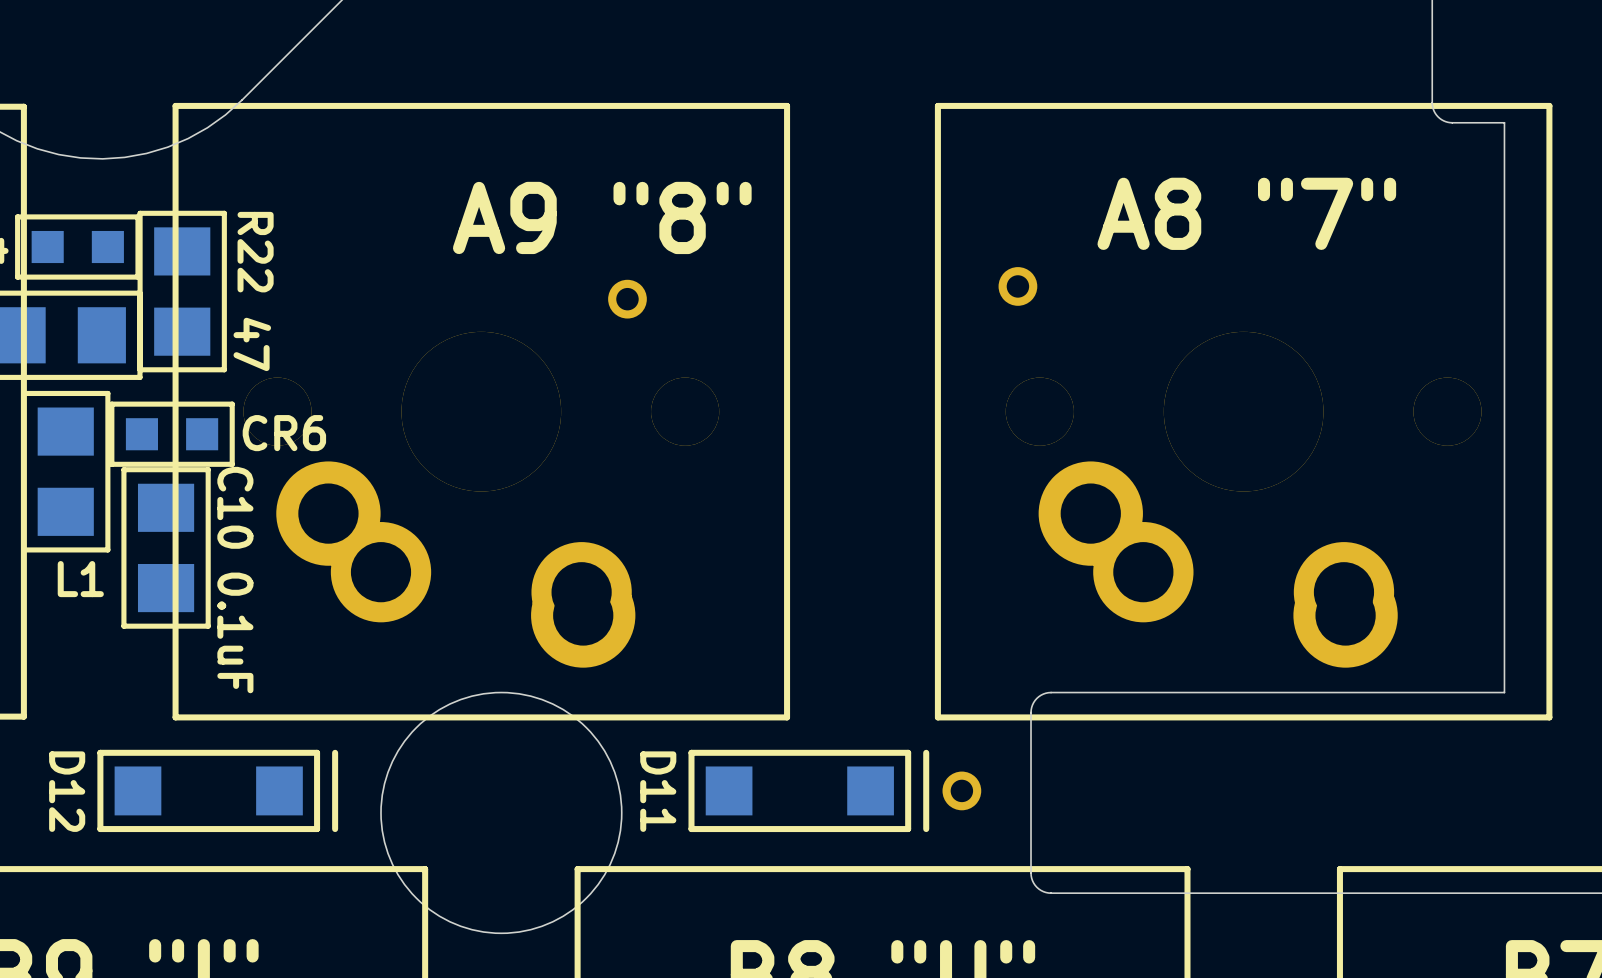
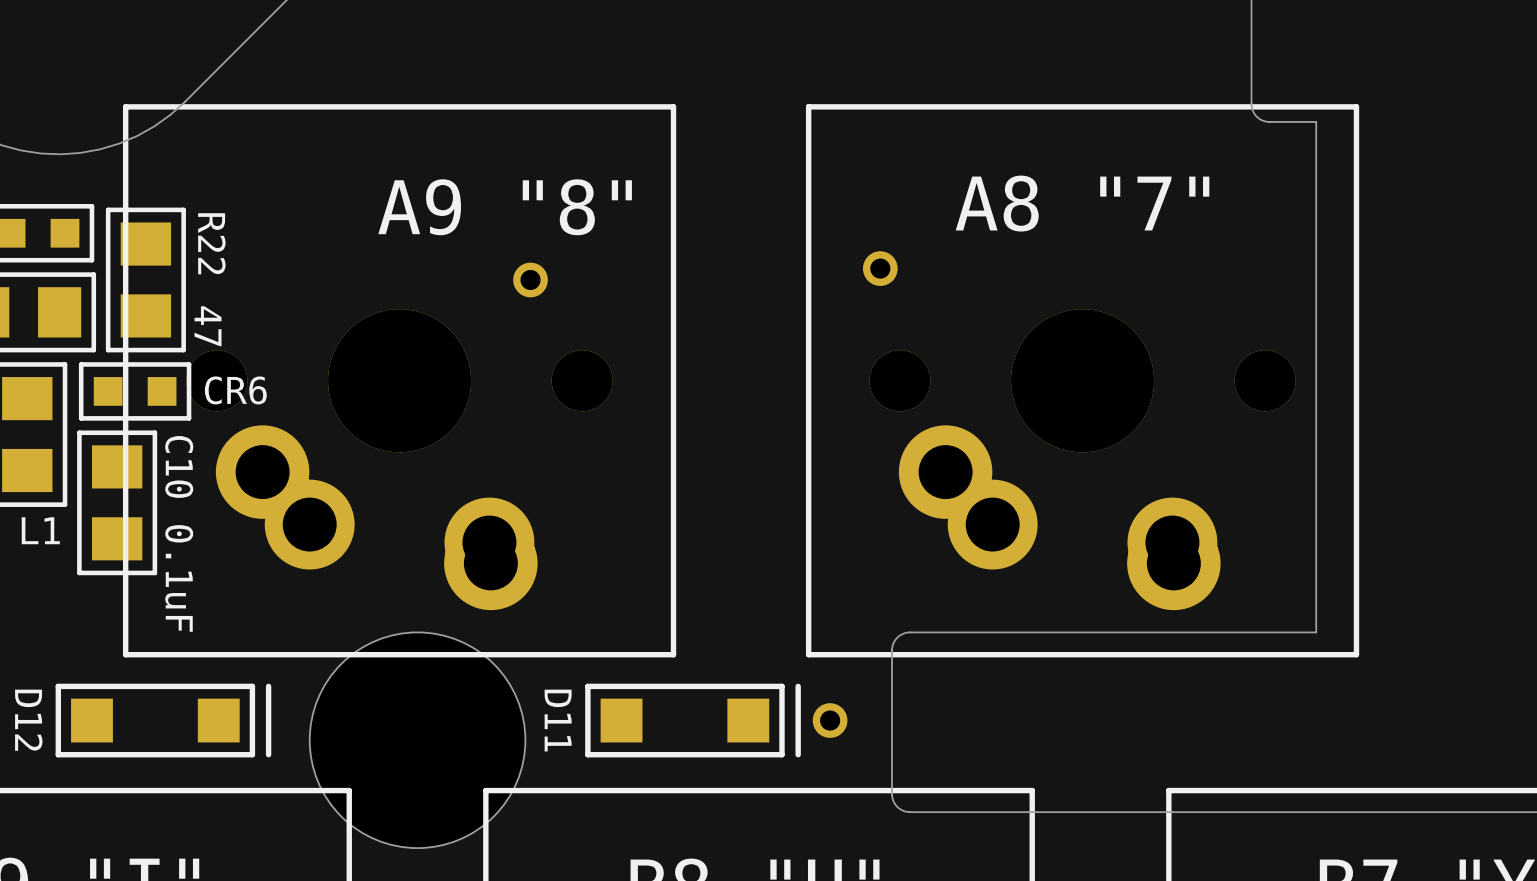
R22 position: (182, 291) -> (145, 279)
CR6 position: (172, 434) -> (135, 391)

